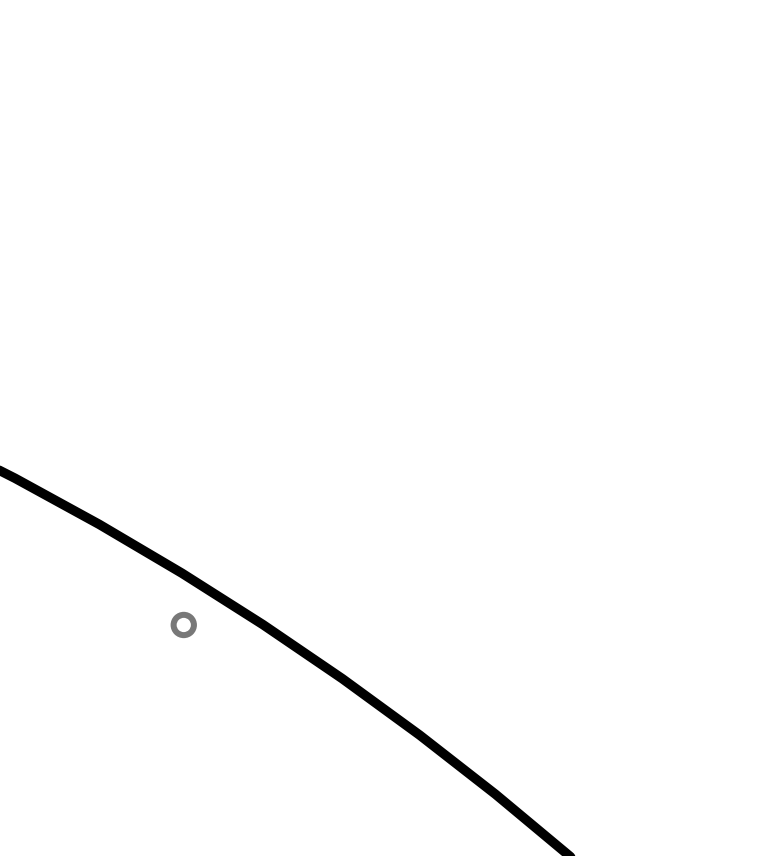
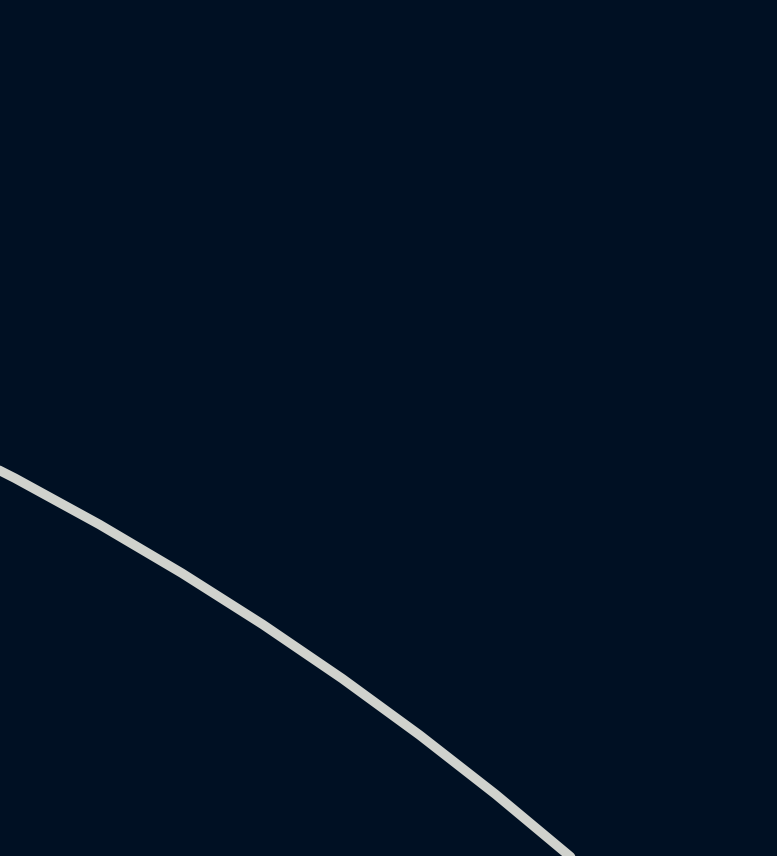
via: (183, 624) -> none

